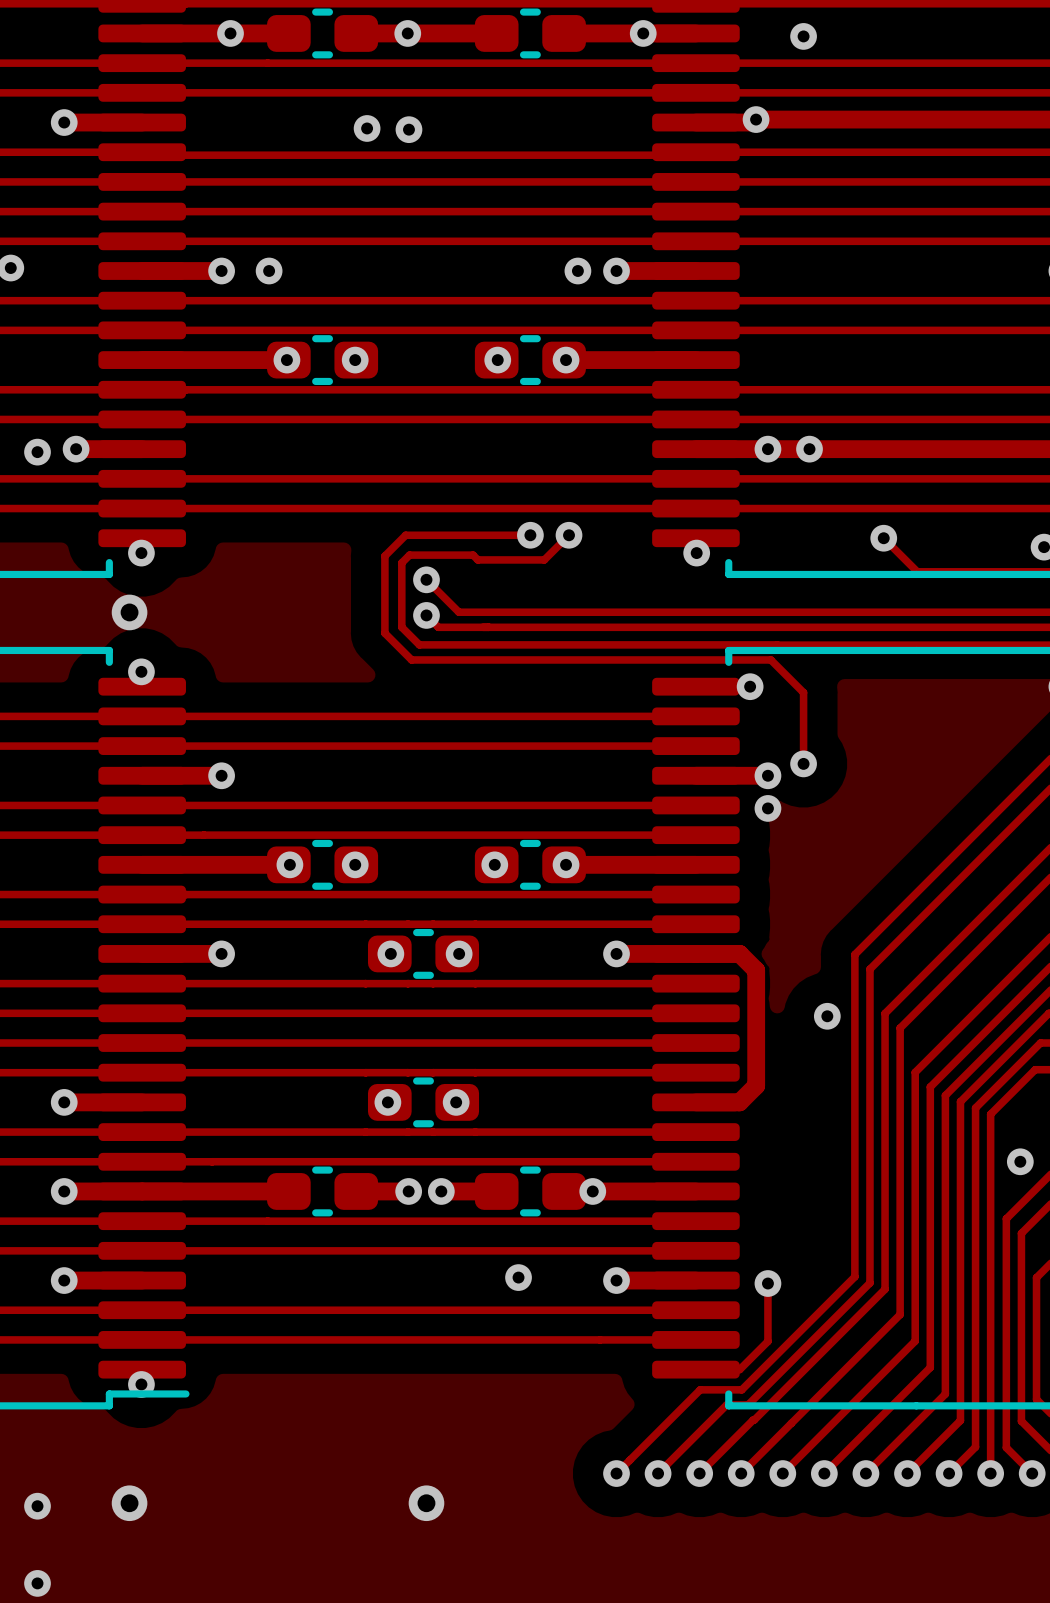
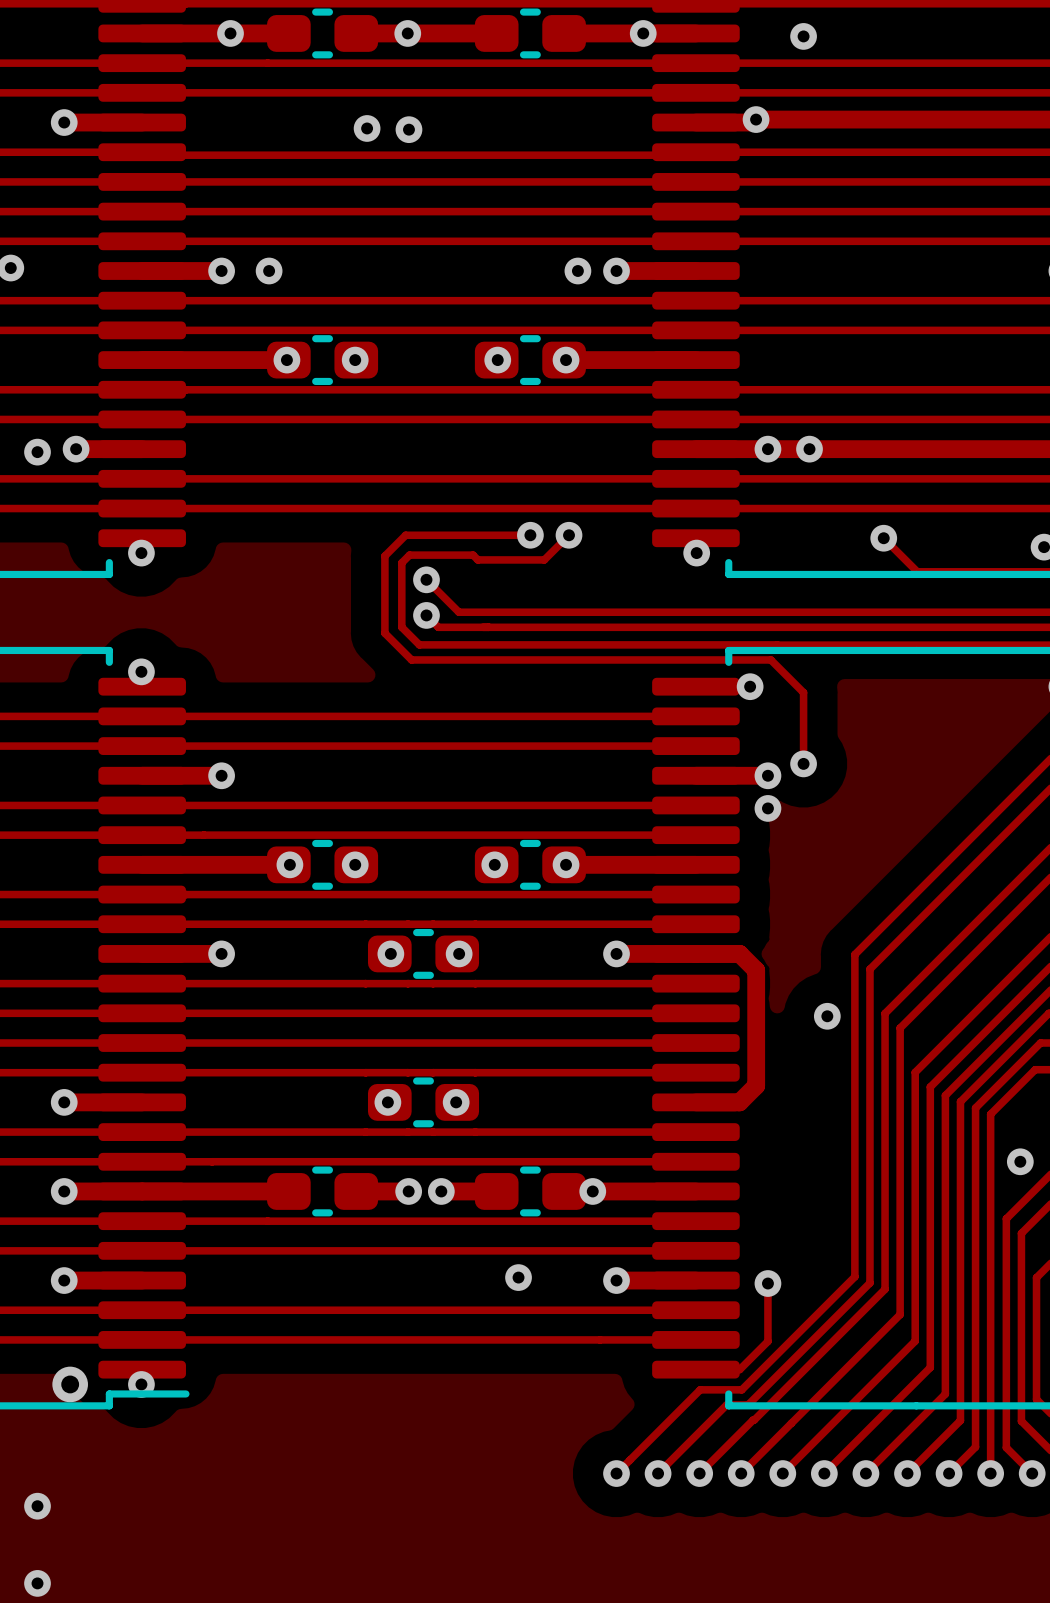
via: (129, 612) -> none
via position: (129, 1503) -> (70, 1384)
via: (426, 1503) -> none

